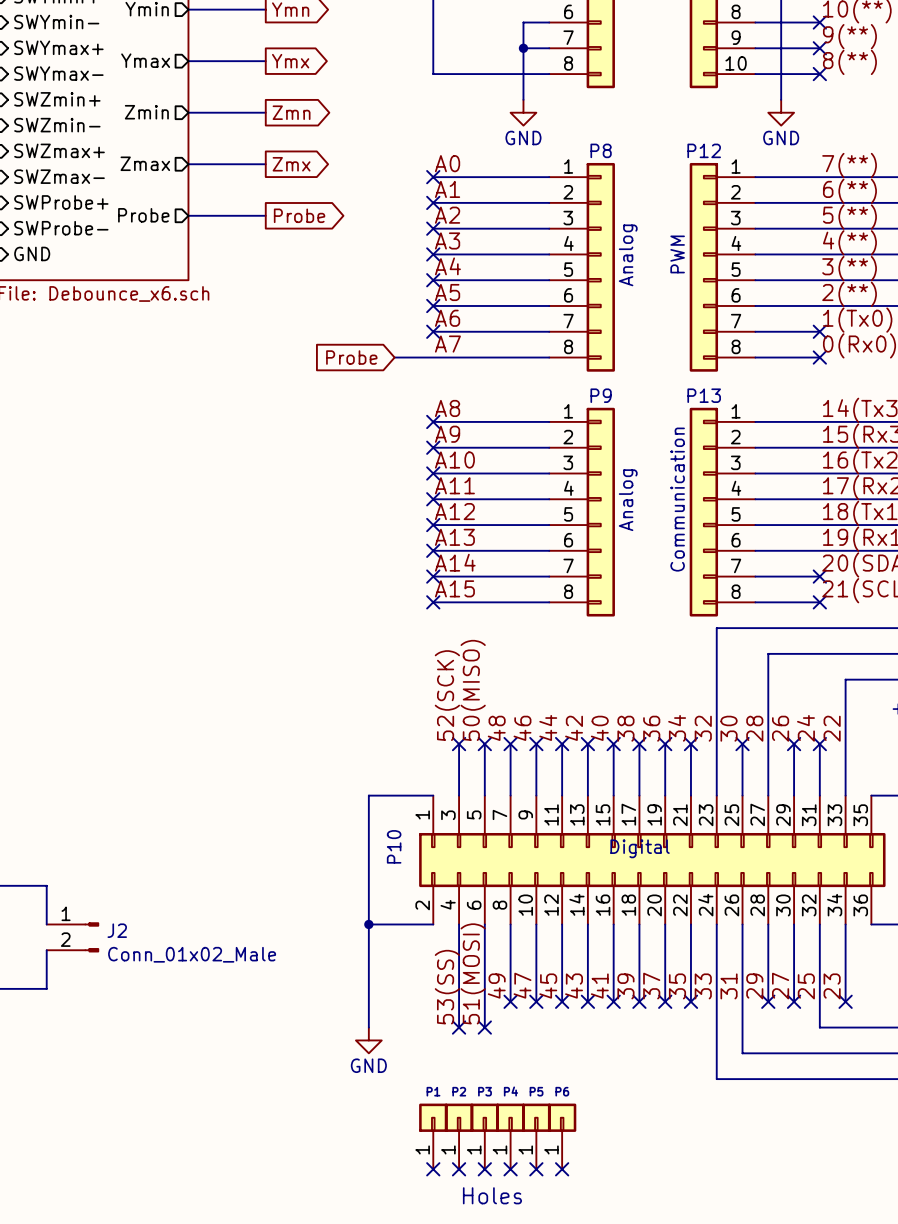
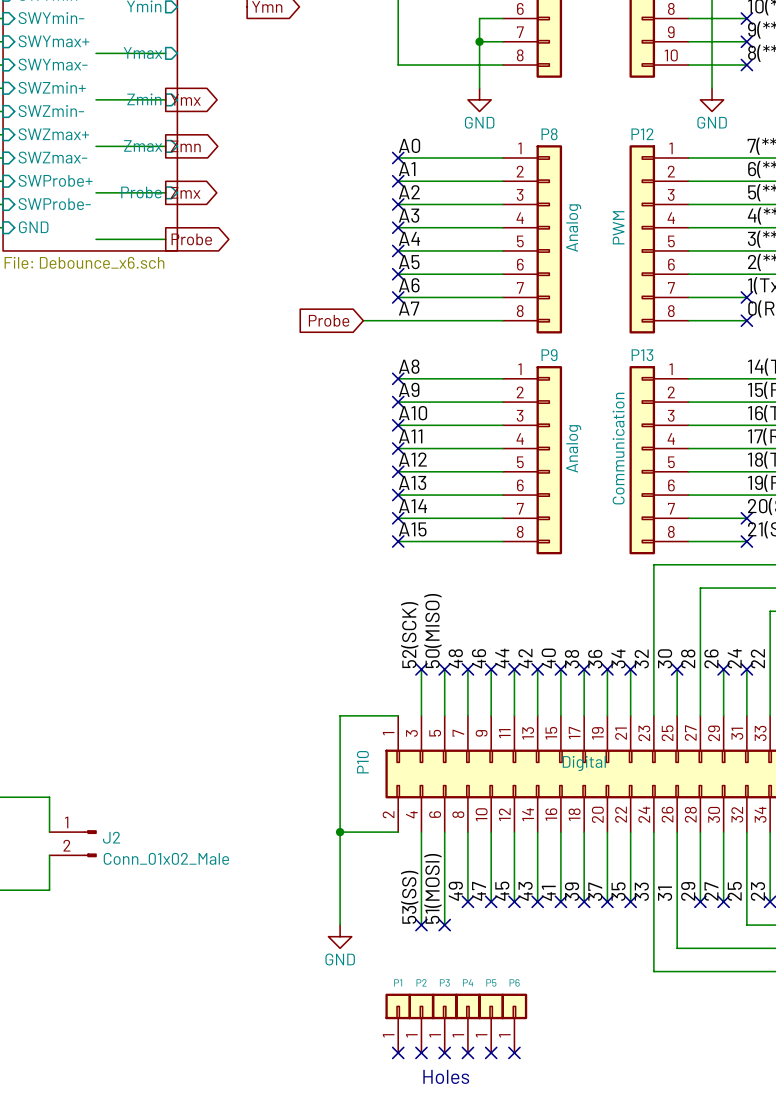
wire: (188, 9) (265, 9) -> (96, 53) (165, 53)
wire: (188, 61) (265, 61) -> (96, 99) (165, 99)
global label position: Ymx (290, 61) -> Ymx (185, 99)
wire: (188, 112) (265, 112) -> (96, 146) (165, 146)
global label position: Zmn (291, 112) -> Zmn (185, 146)
wire: (188, 164) (265, 164) -> (96, 192) (165, 192)
global label position: Zmx (291, 164) -> Zmx (185, 192)
wire: (188, 215) (265, 215) -> (96, 239) (165, 239)
global label position: Probe (299, 215) -> Probe (191, 239)

